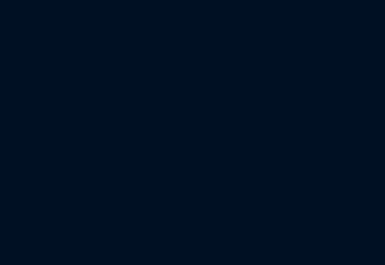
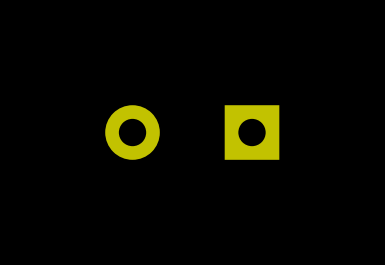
part: none -> (192, 132)

